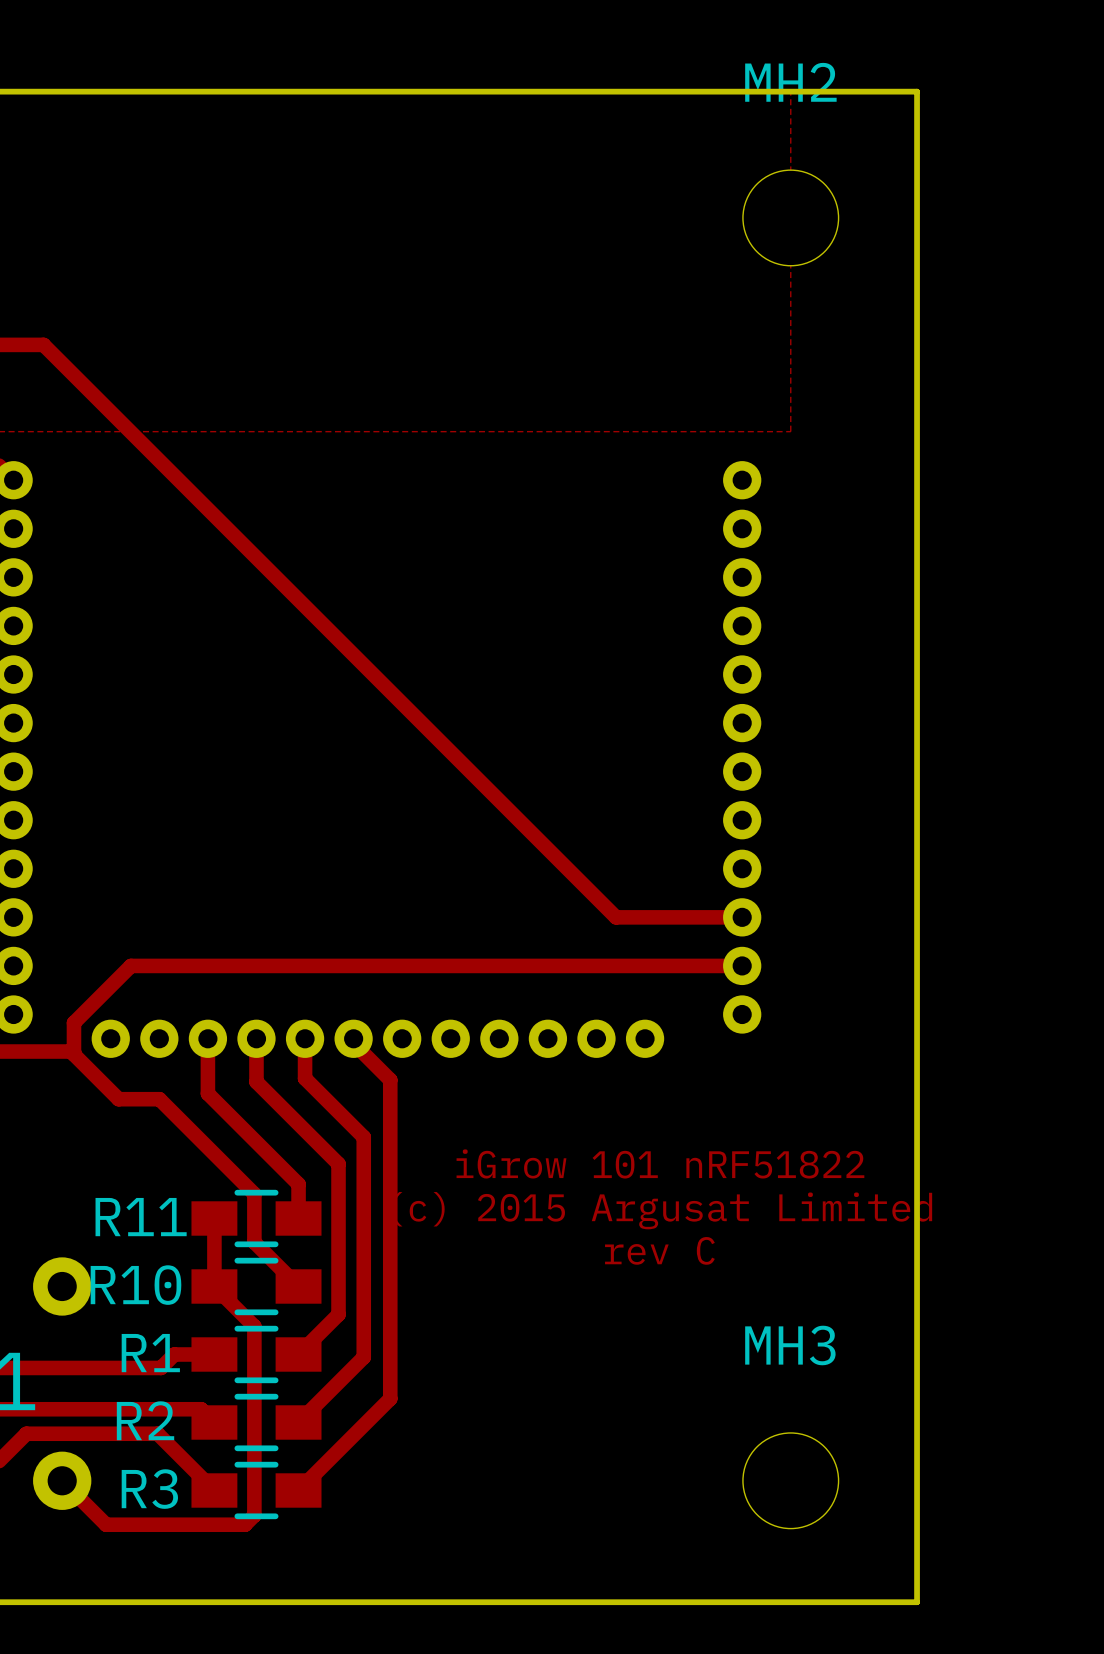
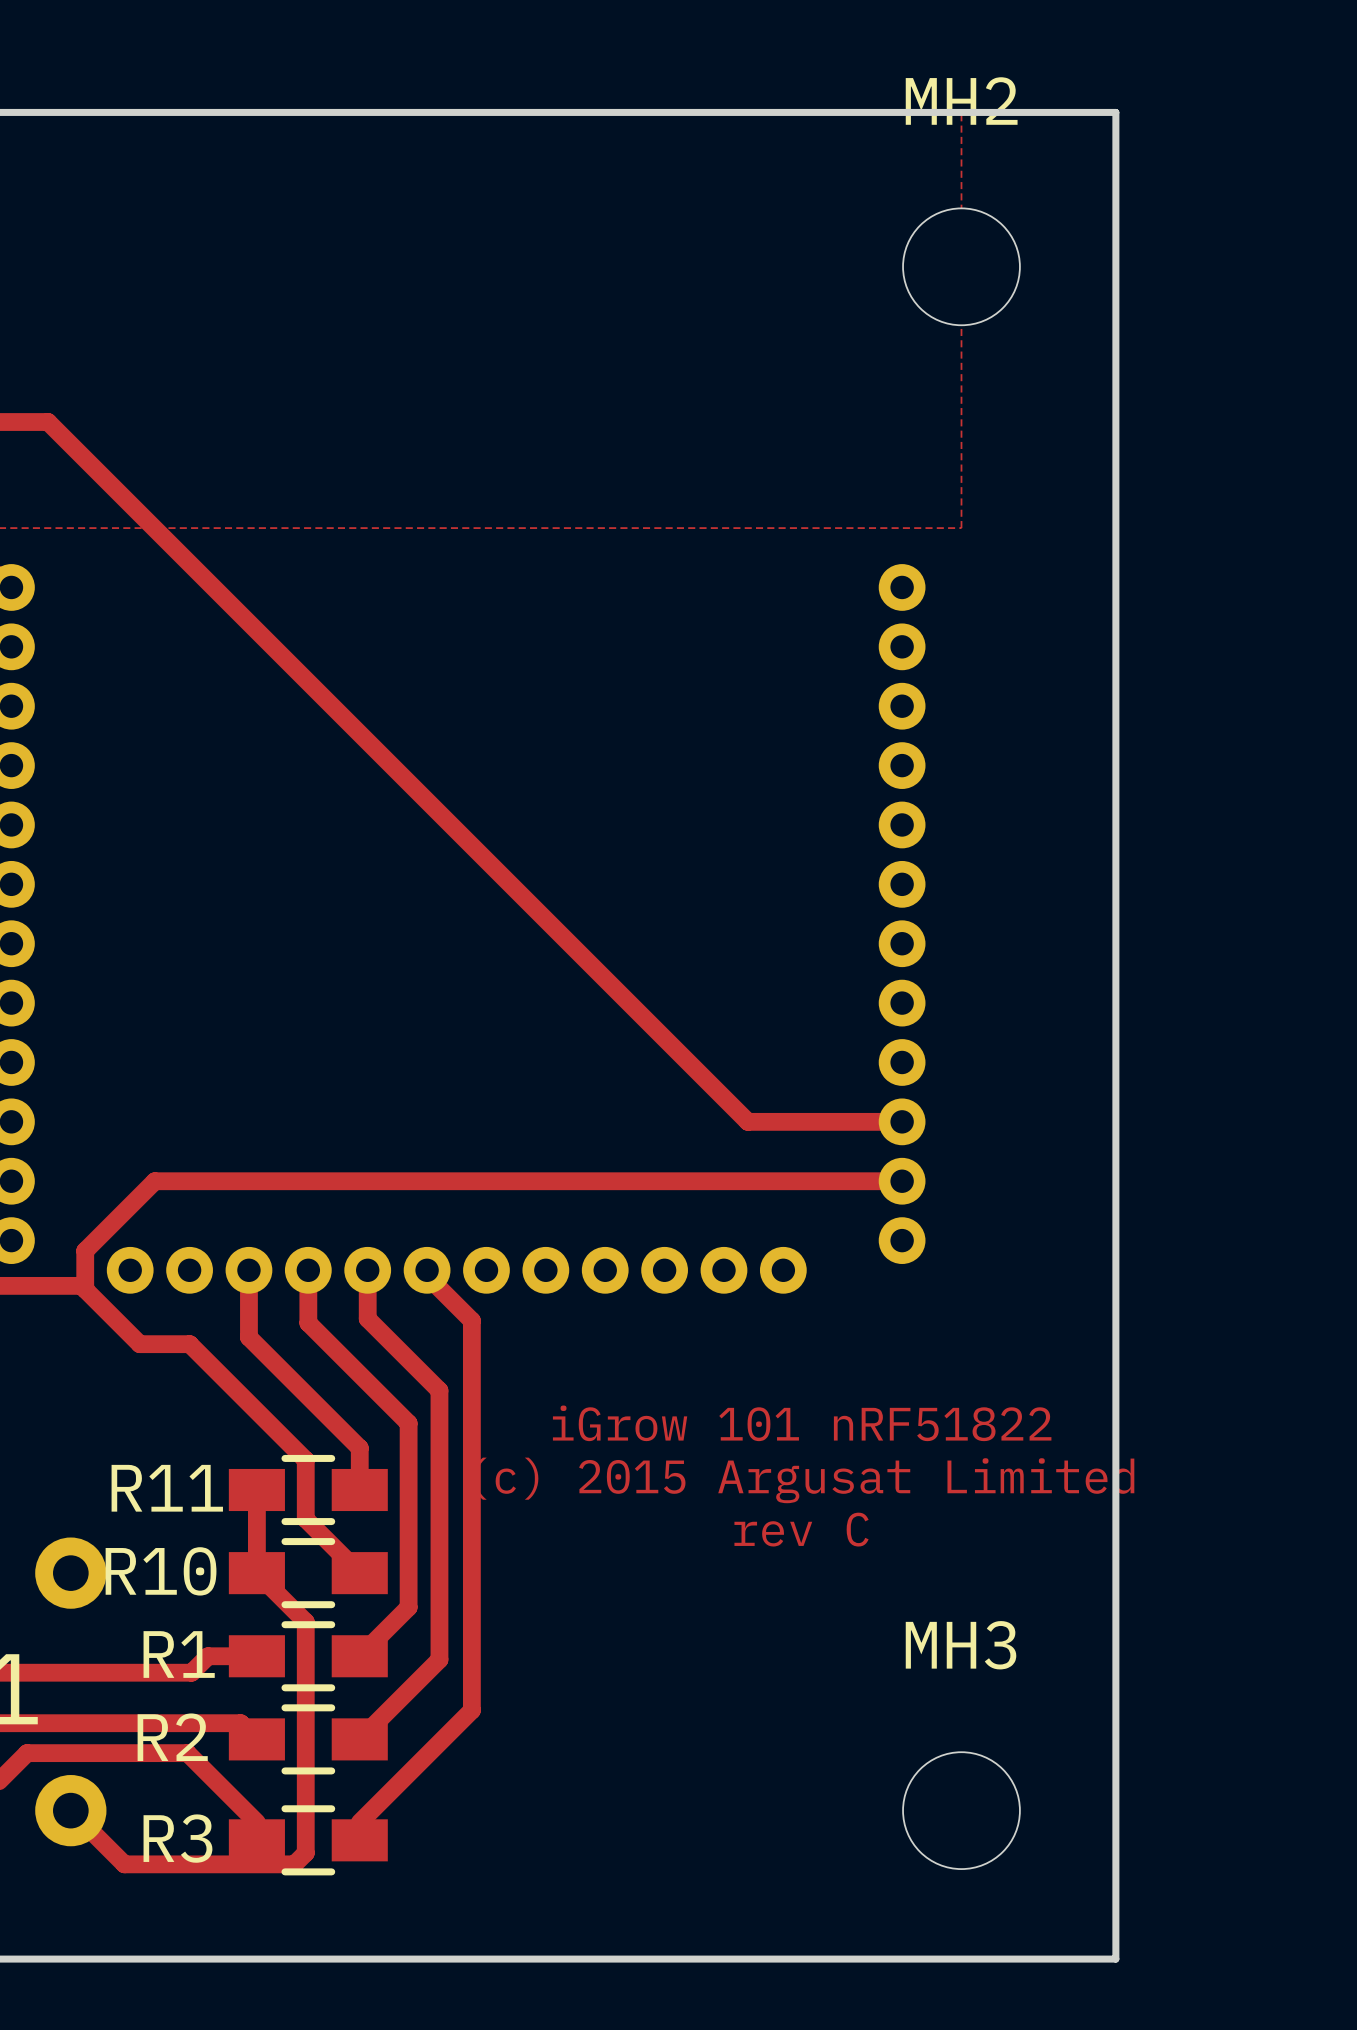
R3 position: (256, 1490) -> (308, 1840)

